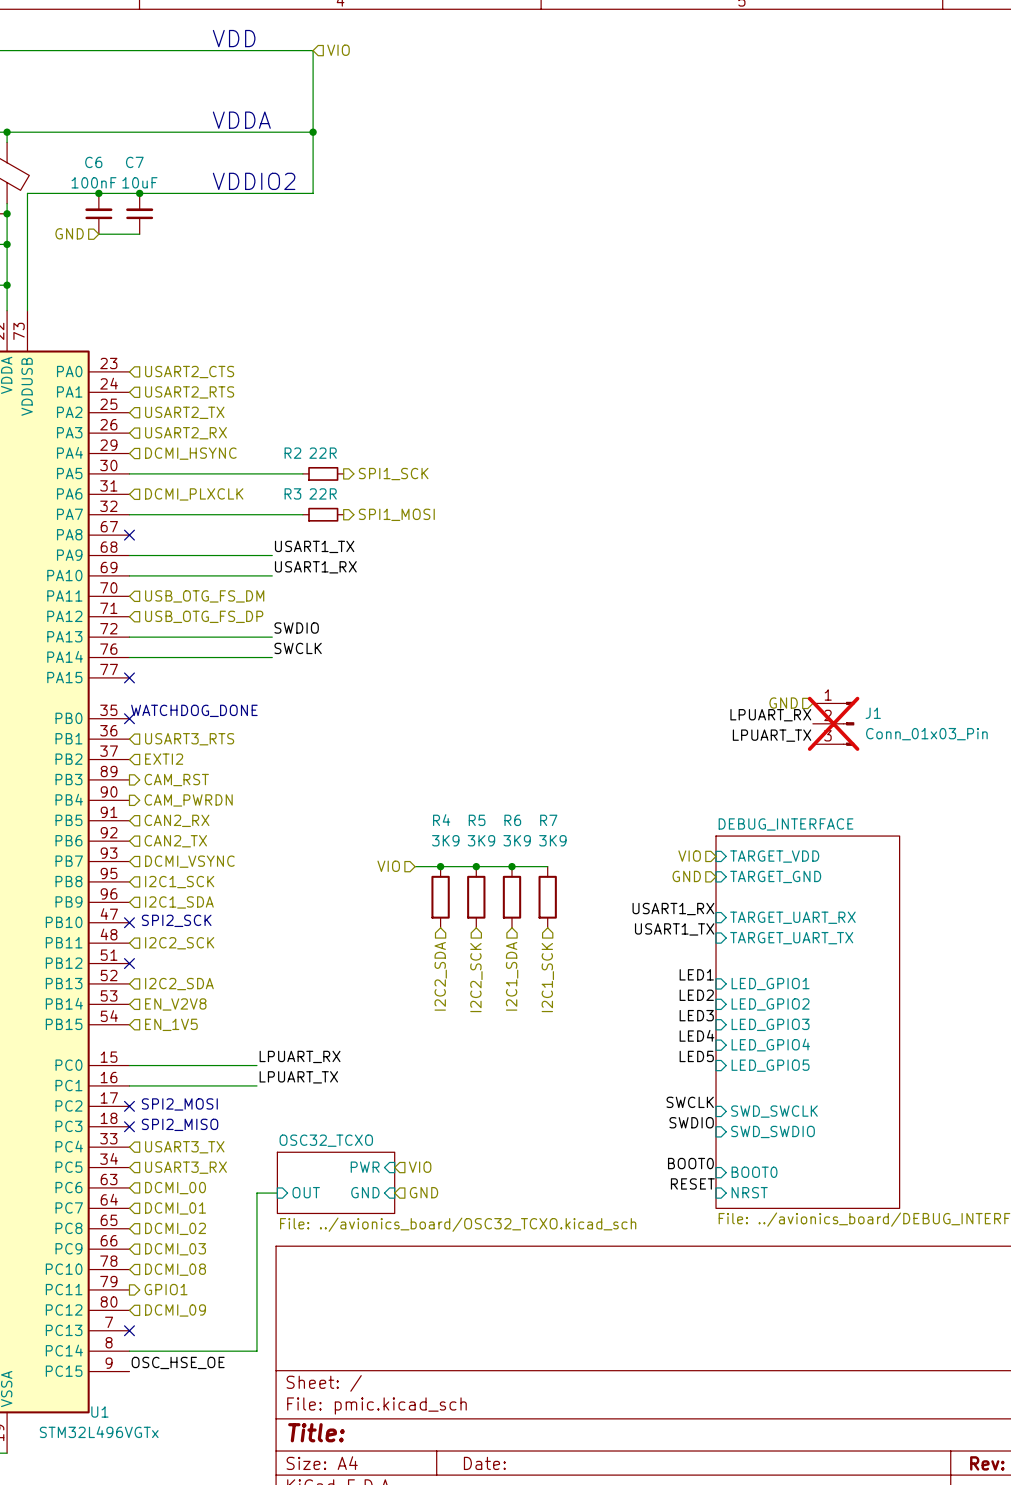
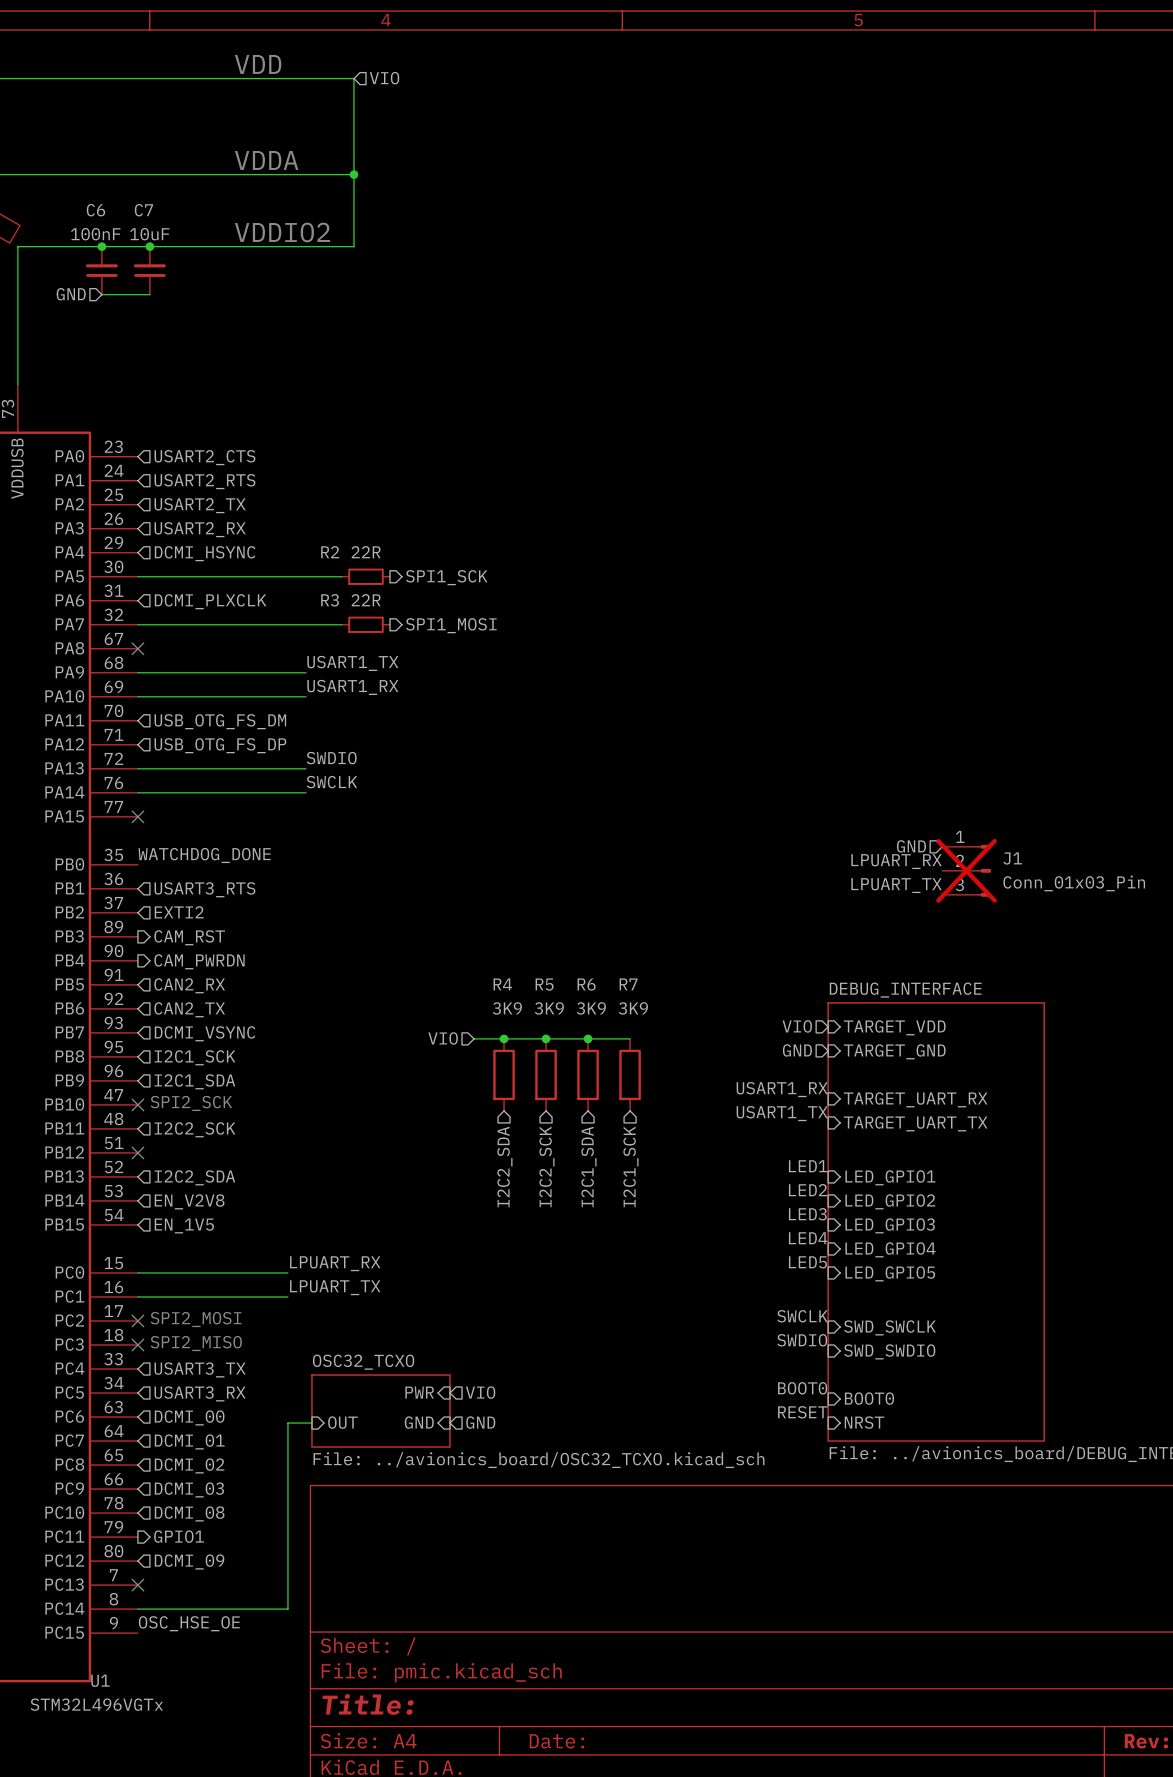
text: WATCHDOG_DONE (194, 710) -> none
label: none -> WATCHDOG_DONE (204, 855)
no-connect mark: (129, 718) -> none

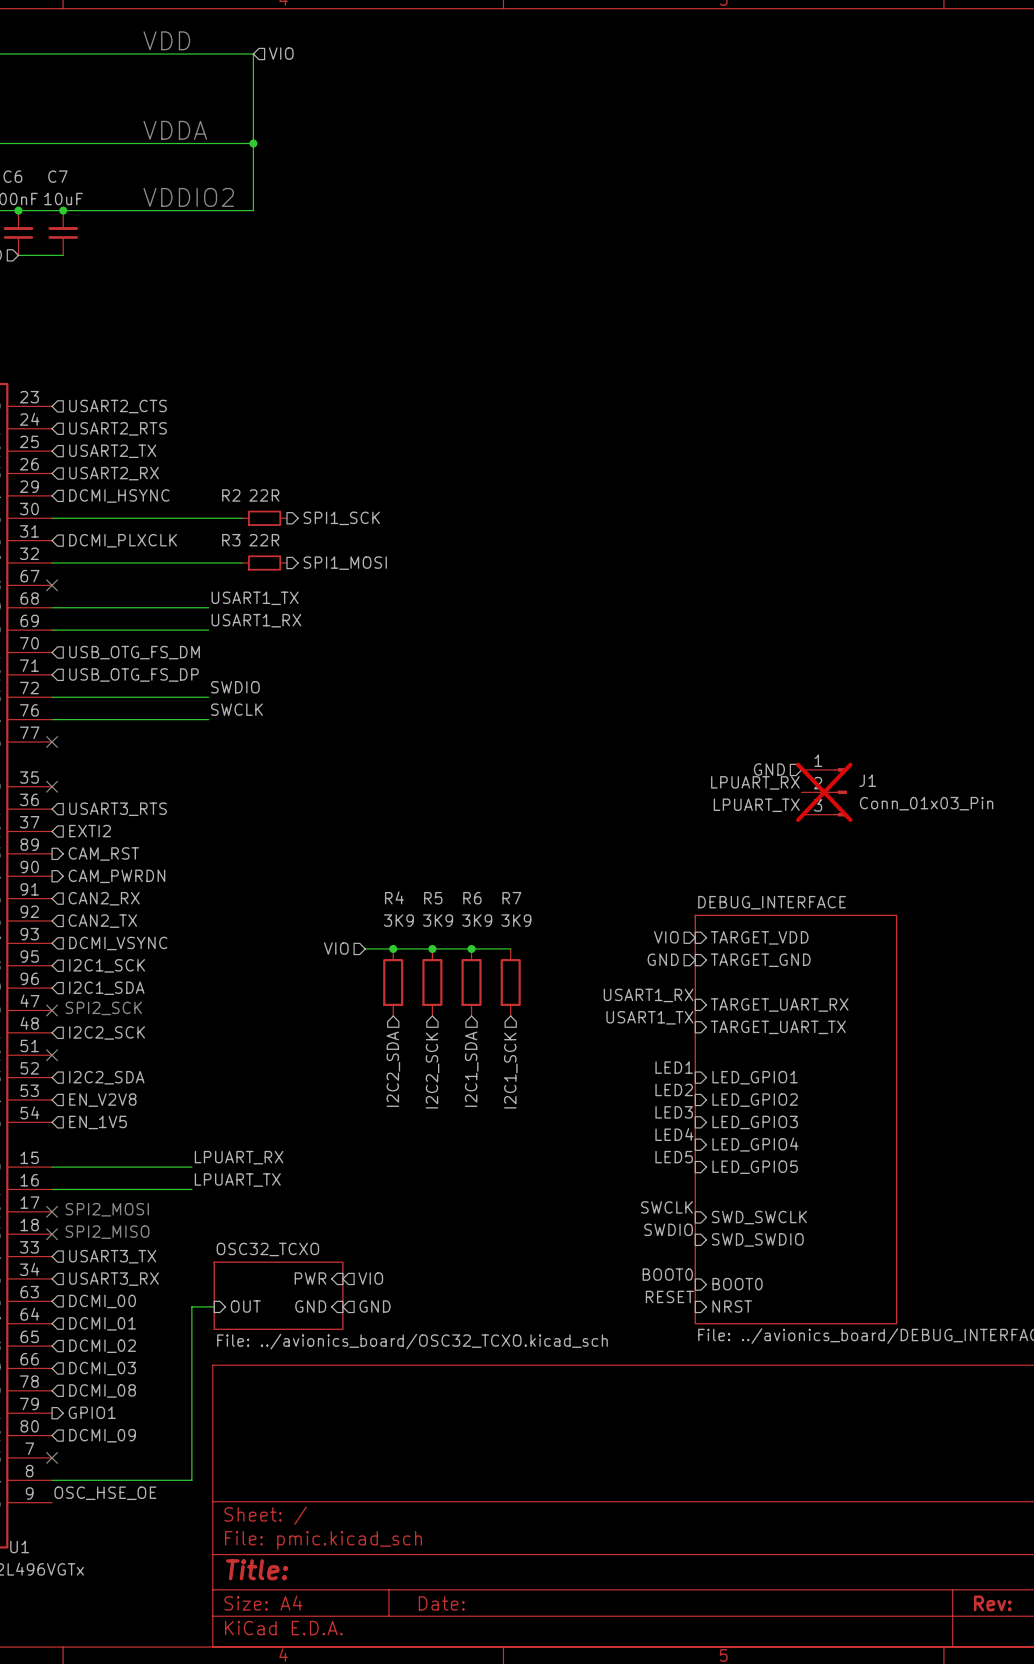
label: WATCHDOG_DONE (204, 855) -> none
no-connect mark: none -> (52, 786)

